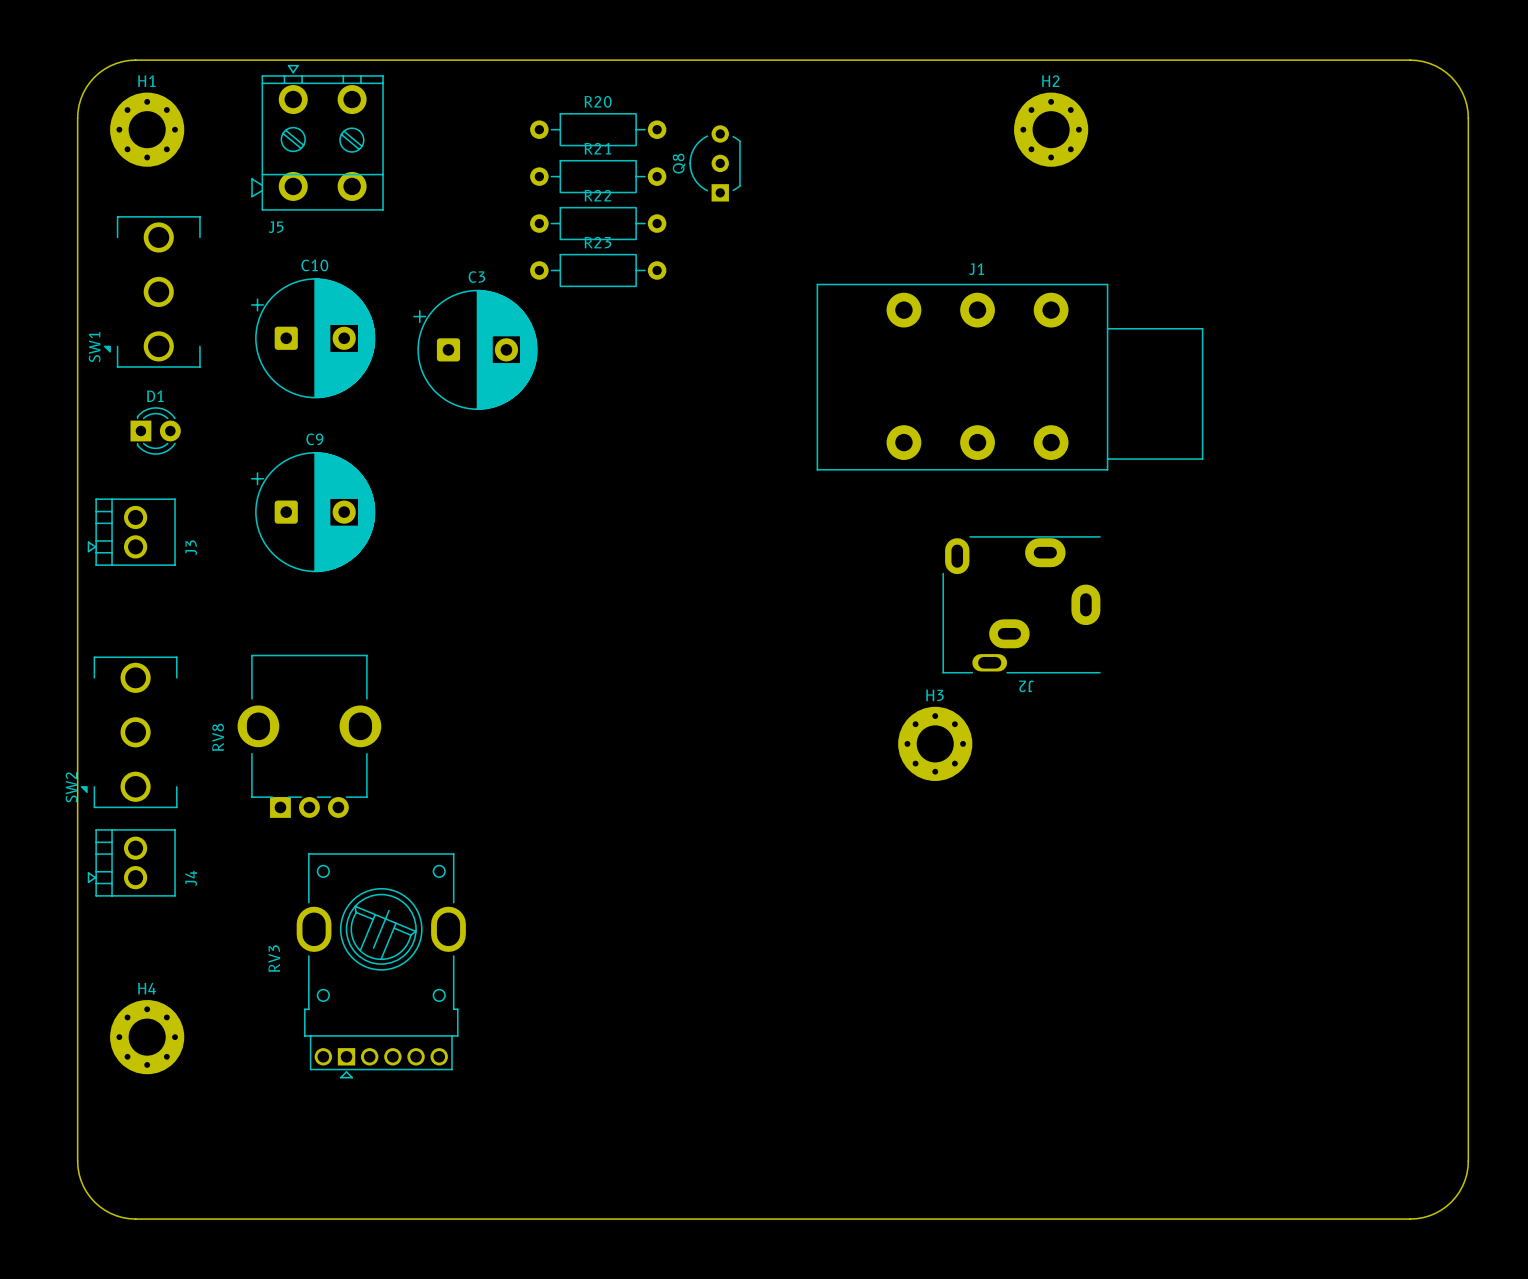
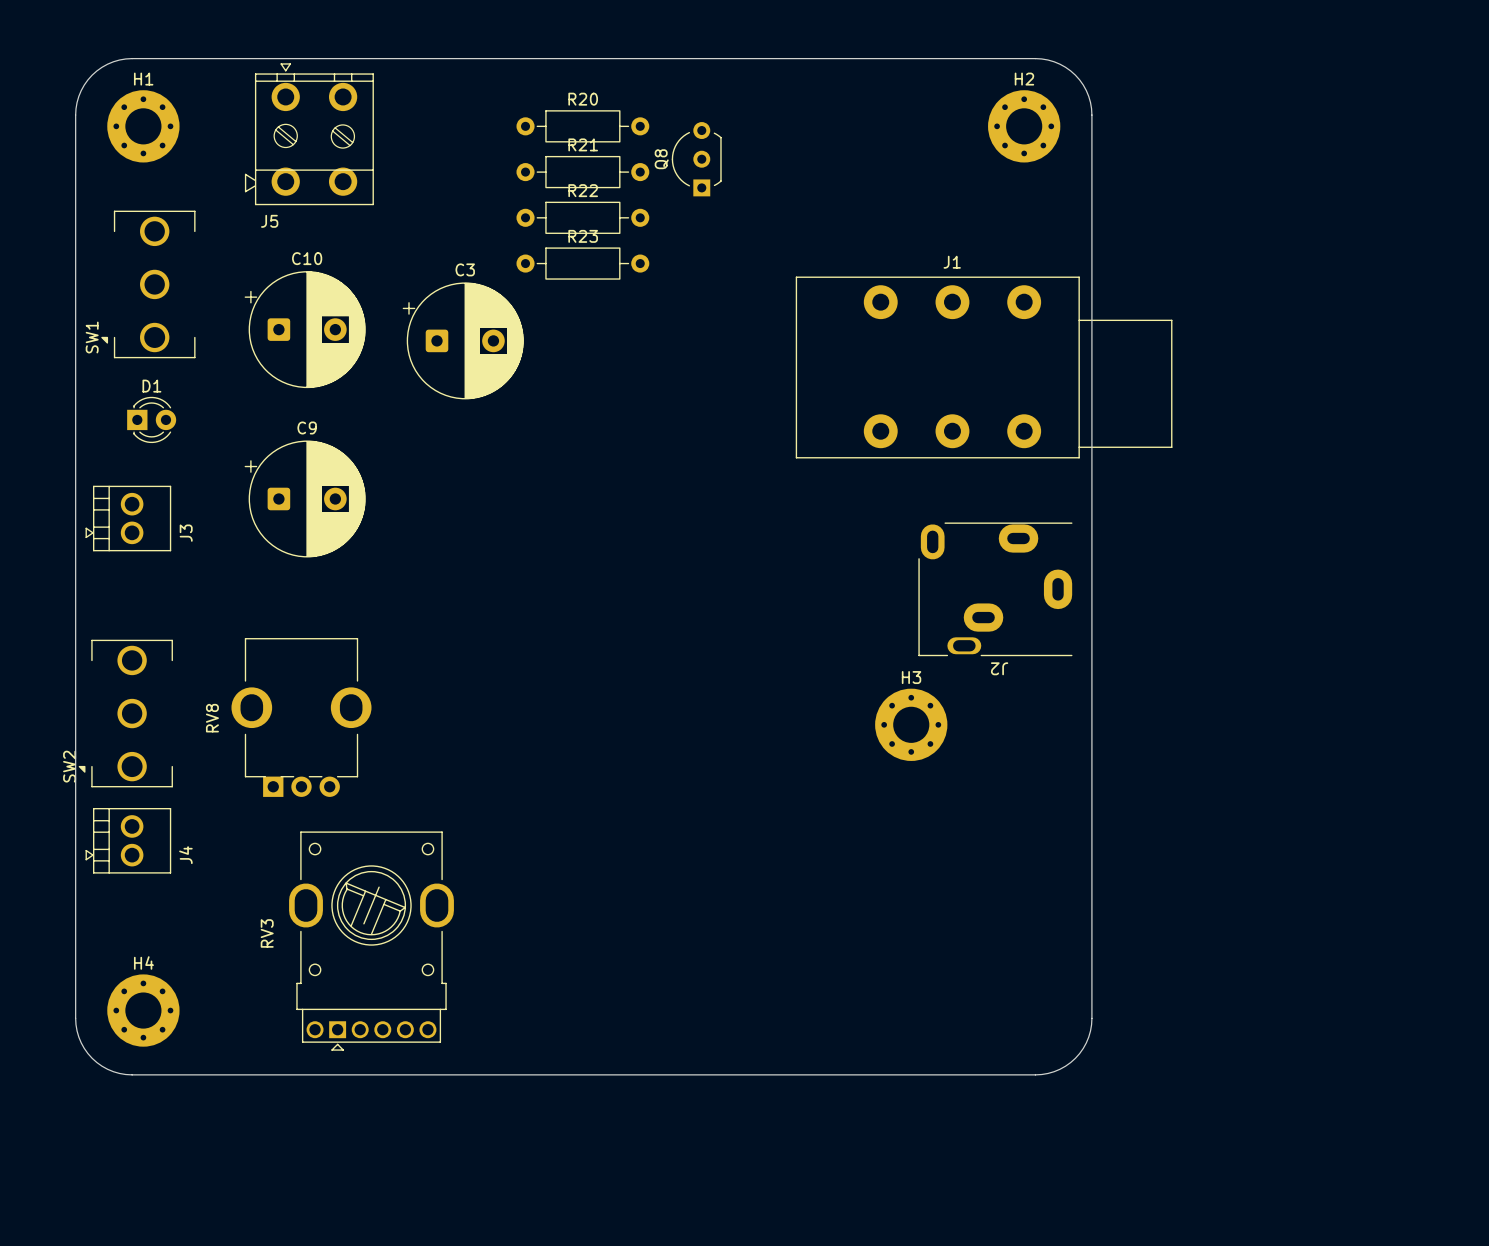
board edge: (1062, 60) (1416, 60) (1429, 63) (1446, 72) (1459, 87) (1465, 98) (1468, 118) (1468, 1161) (1462, 1186) (1451, 1202) (1429, 1215) (1410, 1219) (129, 1218) (110, 1213) (99, 1206) (86, 1191) (80, 1180) (77, 1161) (77, 1045) -> (1035, 58) (1059, 64) (1075, 75) (1086, 90) (1091, 115) (1091, 1018) (1088, 1037) (1075, 1058) (1054, 1071) (1035, 1074) (132, 1074) (107, 1069) (92, 1058) (78, 1037) (75, 1018)

